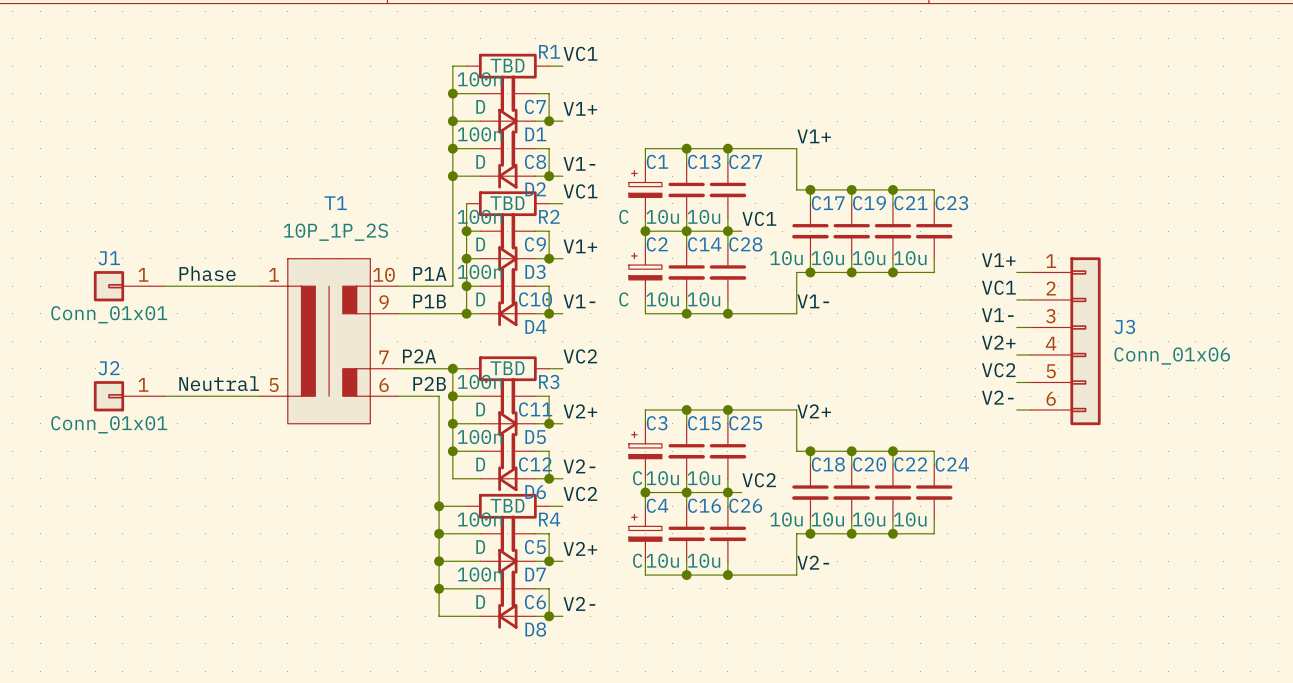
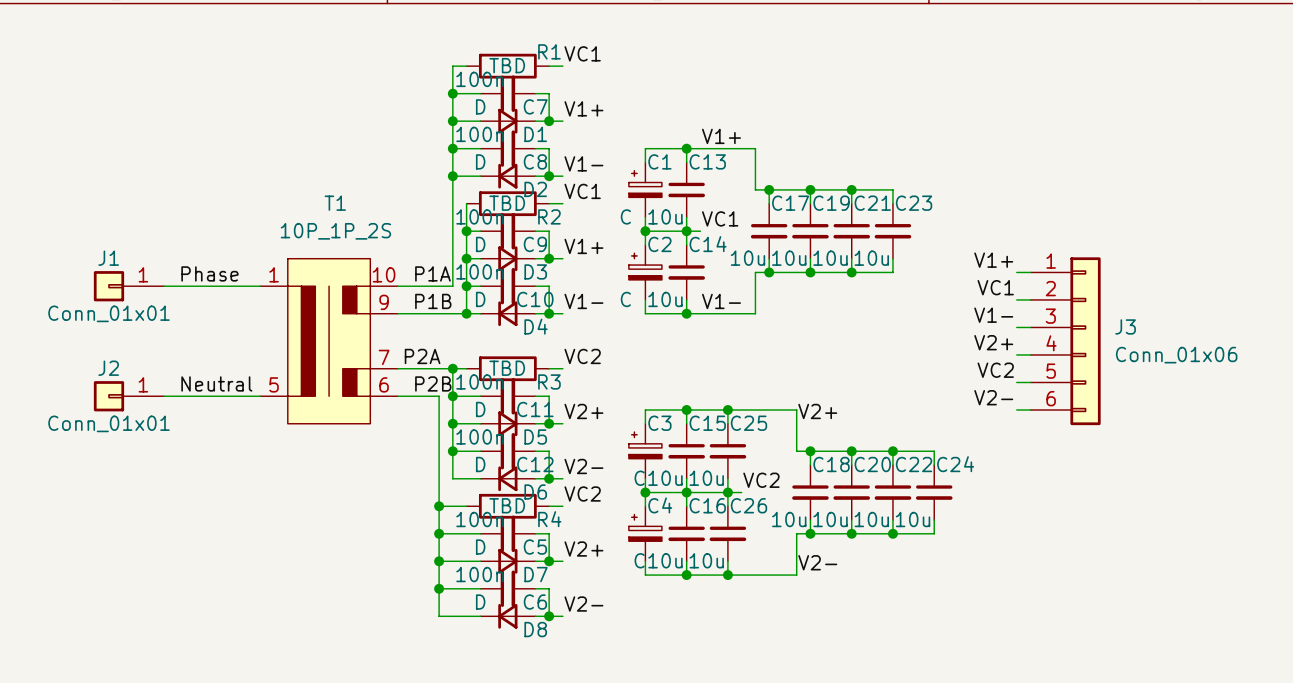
label position: V1+ (814, 136) -> V1+ (721, 136)
wire: (727, 148) (727, 162) -> (769, 189) (769, 203)
junction: (727, 148) -> none
wire: (755, 148) (796, 148) (796, 189) -> (755, 148) (755, 189) (796, 189)
C27: 10u (727, 189) -> none
junction: none -> (769, 189)
wire: (892, 189) (934, 189) (934, 203) -> none
junction: (892, 189) -> none
C17 name: C17 (828, 203) -> C19 (831, 203)
C19 name: C19 (869, 203) -> C21 (872, 203)
C21 name: C21 (910, 203) -> C23 (914, 203)
wire: (727, 217) (727, 244) -> none
label position: VC1 (759, 218) -> VC1 (720, 218)
wire: (700, 231) (741, 231) -> none
junction: (727, 231) -> none
C17: none -> 10u (769, 231)
C23: 10u (934, 231) -> none
wire: (934, 258) (934, 272) (892, 272) -> none
C28: 10u (727, 272) -> none
junction: none -> (769, 272)
wire: (796, 272) (796, 313) (755, 313) -> (796, 272) (755, 272) (755, 313)
junction: (892, 272) -> none
wire: (727, 299) (727, 313) -> (769, 258) (769, 272)
label position: V1- (813, 301) -> V1- (721, 301)
junction: (727, 313) -> none

